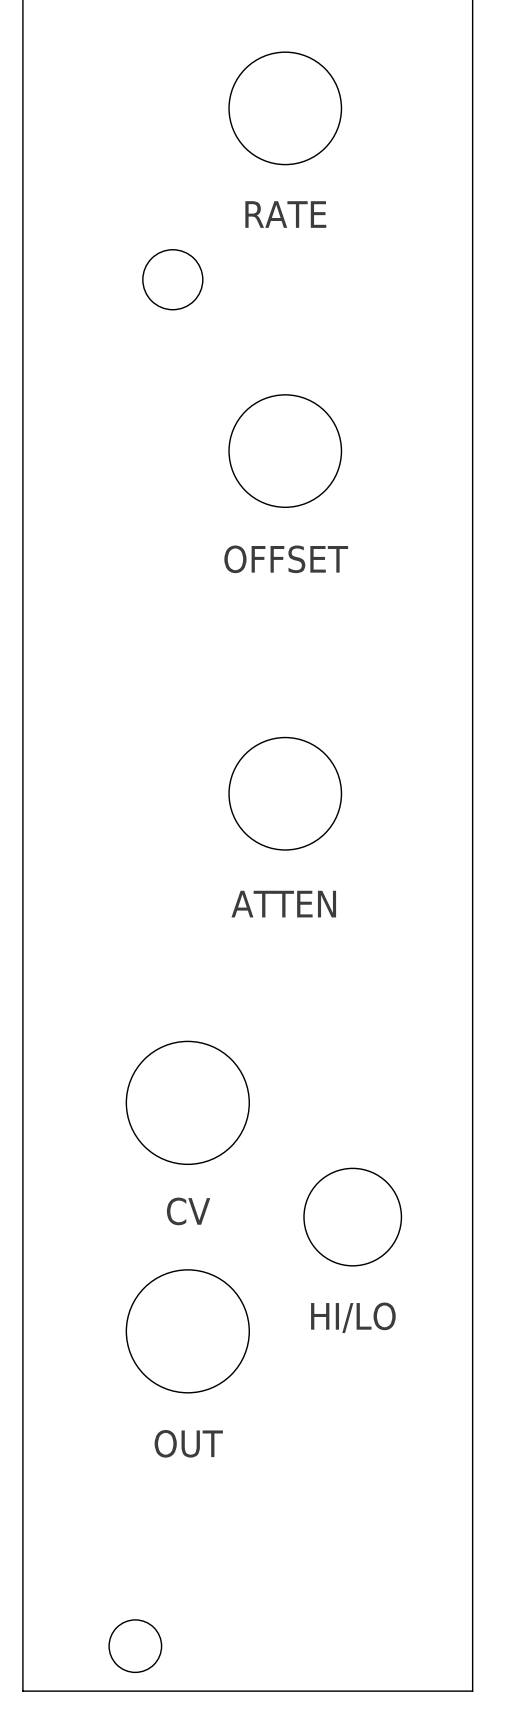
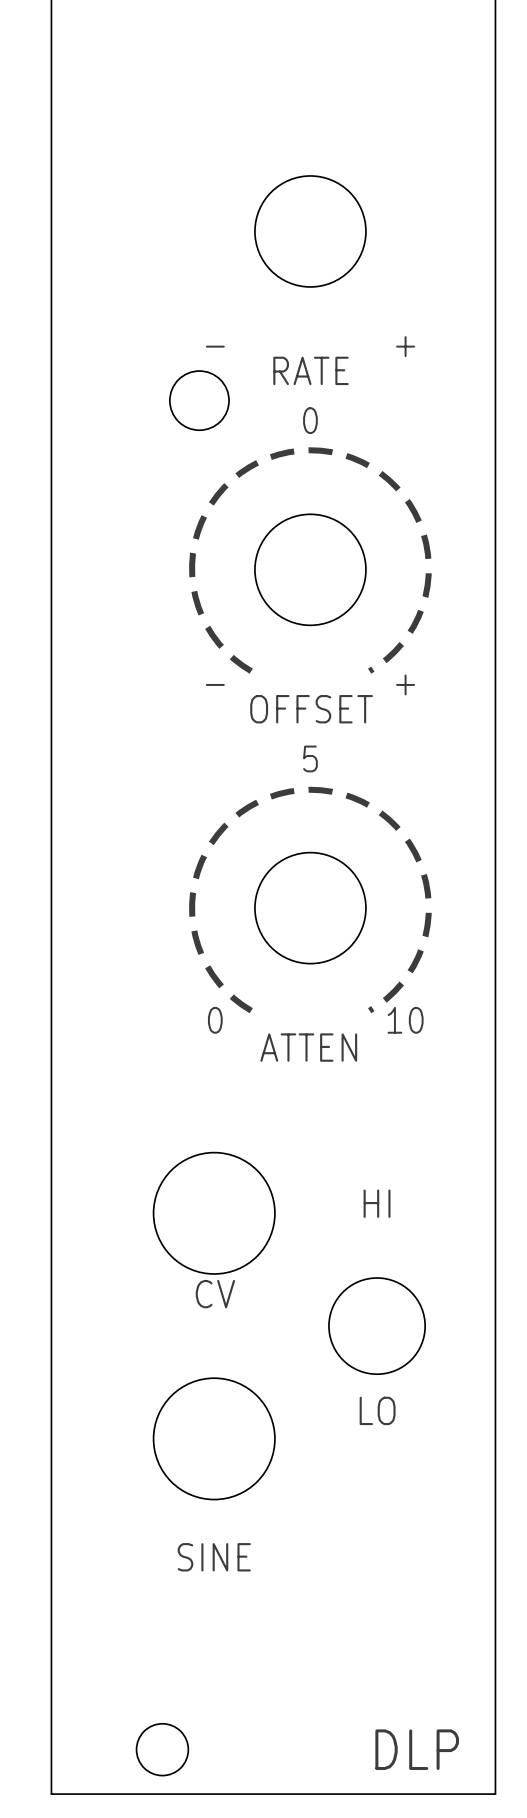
text position: RATE (285, 214) -> RATE (311, 370)
text: none -> + (405, 346)
text: none -> - (215, 346)
text: none -> 0 (310, 420)
line: none -> (251, 671) (225, 651) (212, 635) (202, 616) (195, 596) (192, 575) (194, 543) (205, 513) (217, 495) (232, 479) (249, 467) (268, 457) (289, 452) (310, 450) (331, 452) (352, 457) (371, 467) (388, 479) (403, 495) (415, 513) (426, 543) (428, 575) (425, 596) (418, 616) (408, 635) (394, 651) (369, 671)
text position: OFFSET (286, 559) -> OFFSET (311, 709)
text: none -> + (405, 684)
text: none -> - (215, 684)
text: none -> 5 (310, 758)
line: none -> (251, 1010) (225, 991) (212, 974) (202, 955) (195, 935) (192, 914) (194, 882) (205, 852) (217, 834) (232, 819) (249, 806) (268, 797) (289, 791) (310, 789) (331, 791) (352, 797) (371, 806) (388, 819) (403, 834) (415, 852) (426, 882) (428, 914) (425, 935) (418, 955) (408, 974) (394, 991) (369, 1010)
text position: ATTEN (283, 904) -> ATTEN (308, 1047)
text: none -> 0 (215, 1020)
text: none -> 10 (405, 1020)
text: none -> HI (377, 1203)
text position: CV (188, 1211) -> CV (215, 1294)
text: HI/LO (353, 1317) -> LO (377, 1410)
text: OUT (188, 1443) -> SINE (214, 1557)
text: none -> DLP (417, 1749)

